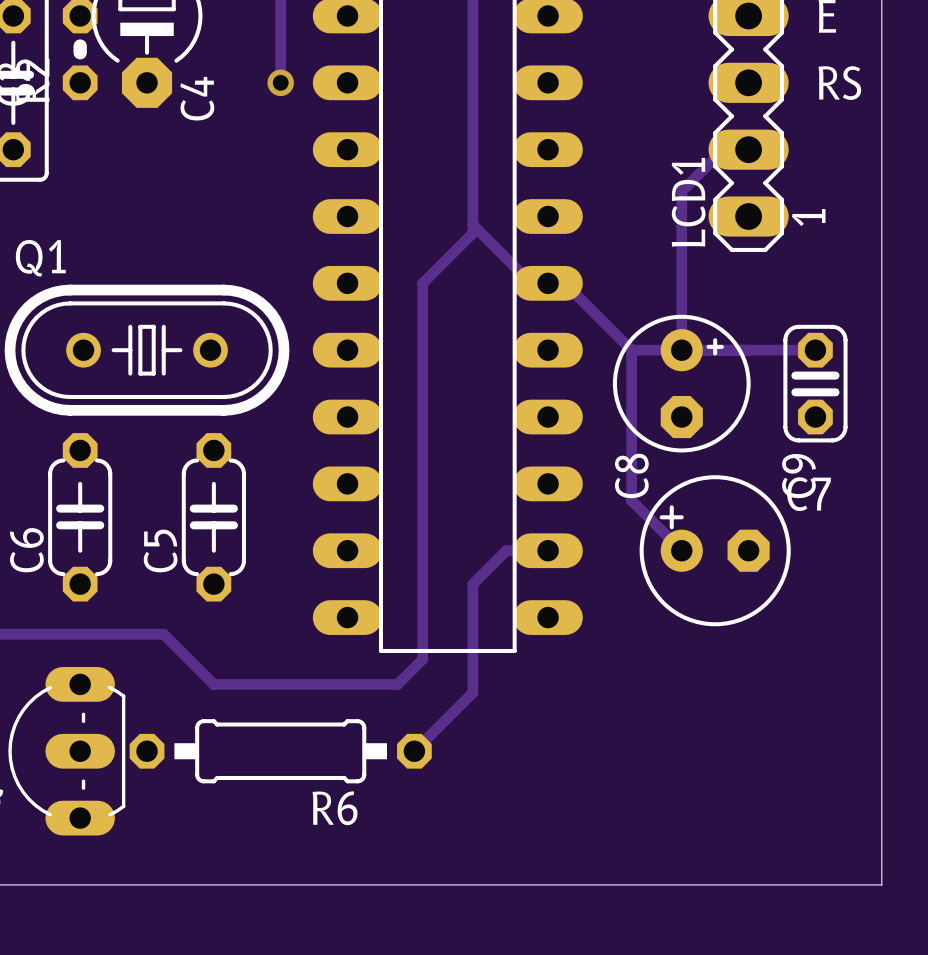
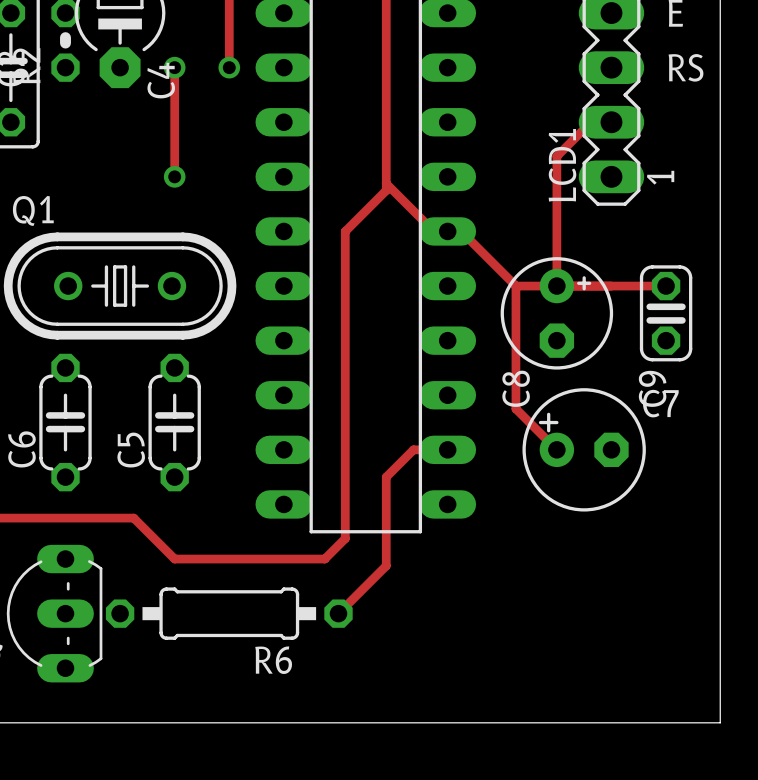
track: none -> (174, 67) (174, 176)
via: none -> (174, 67)
via: none -> (174, 176)

